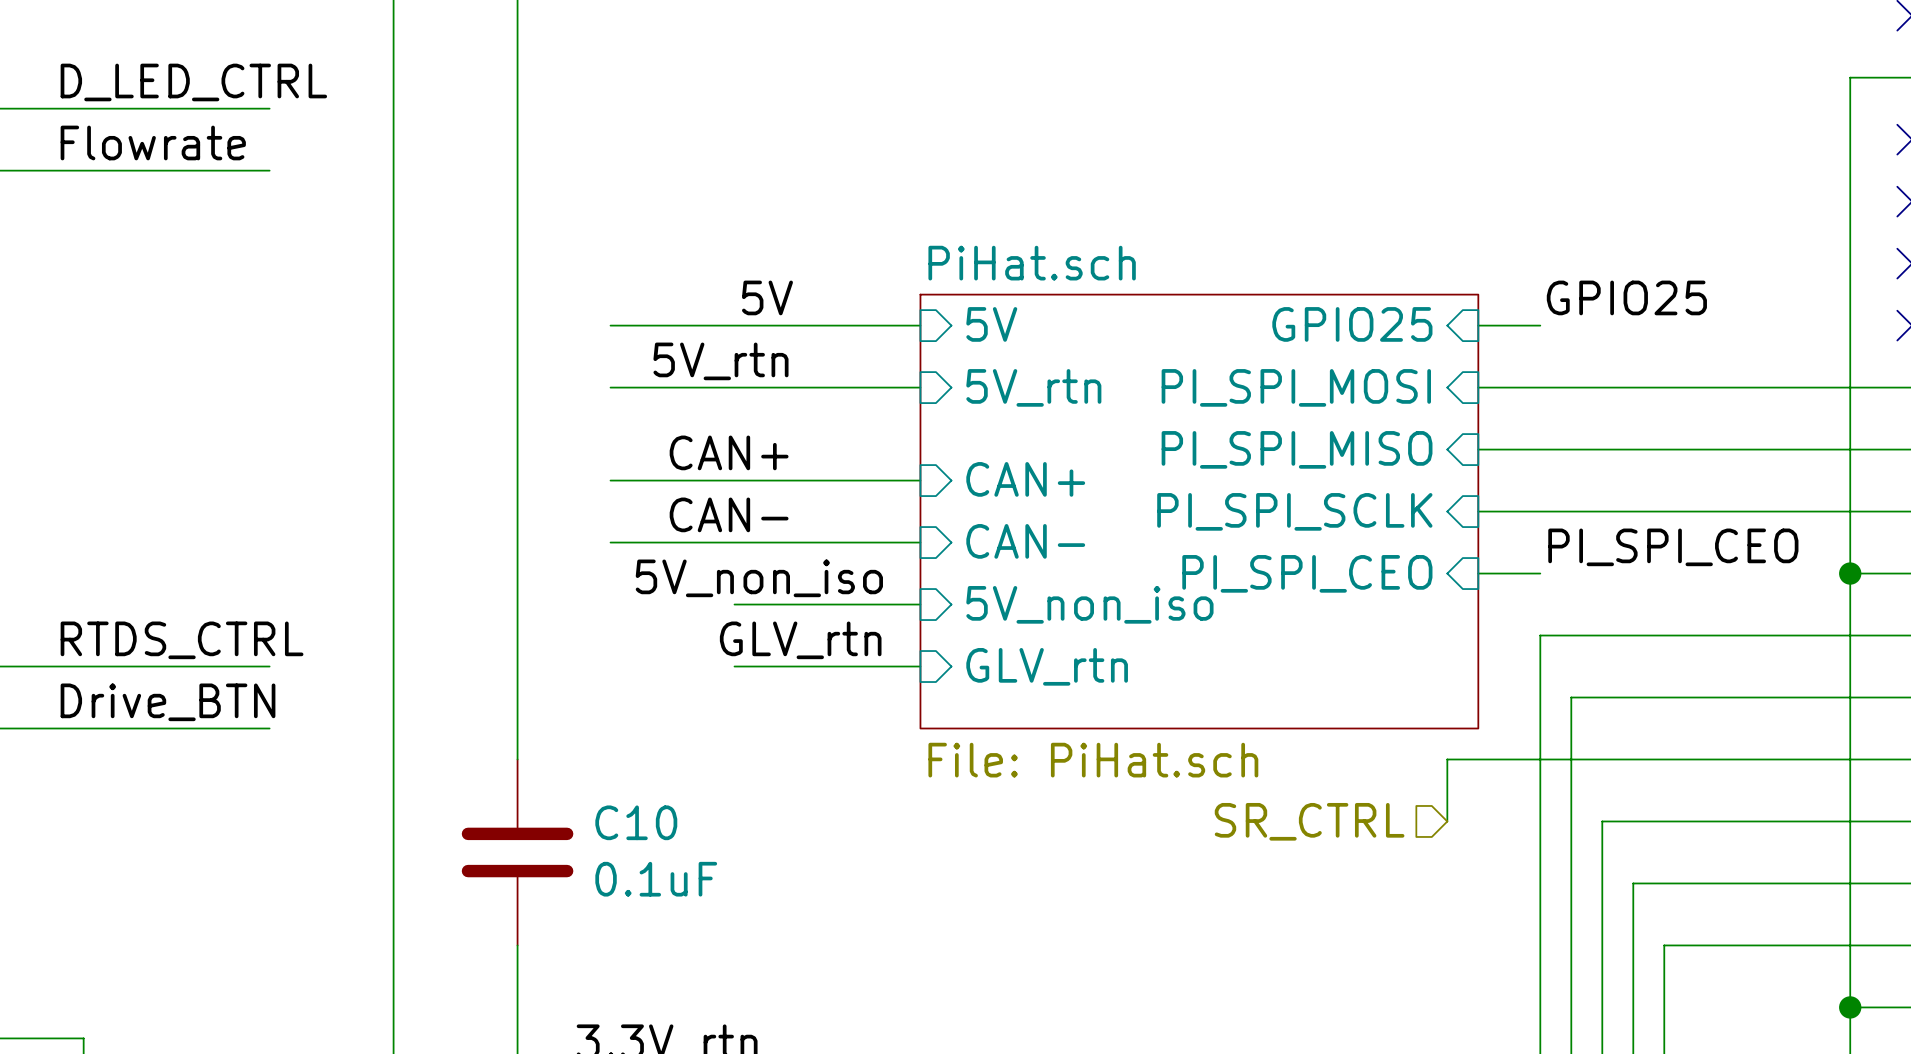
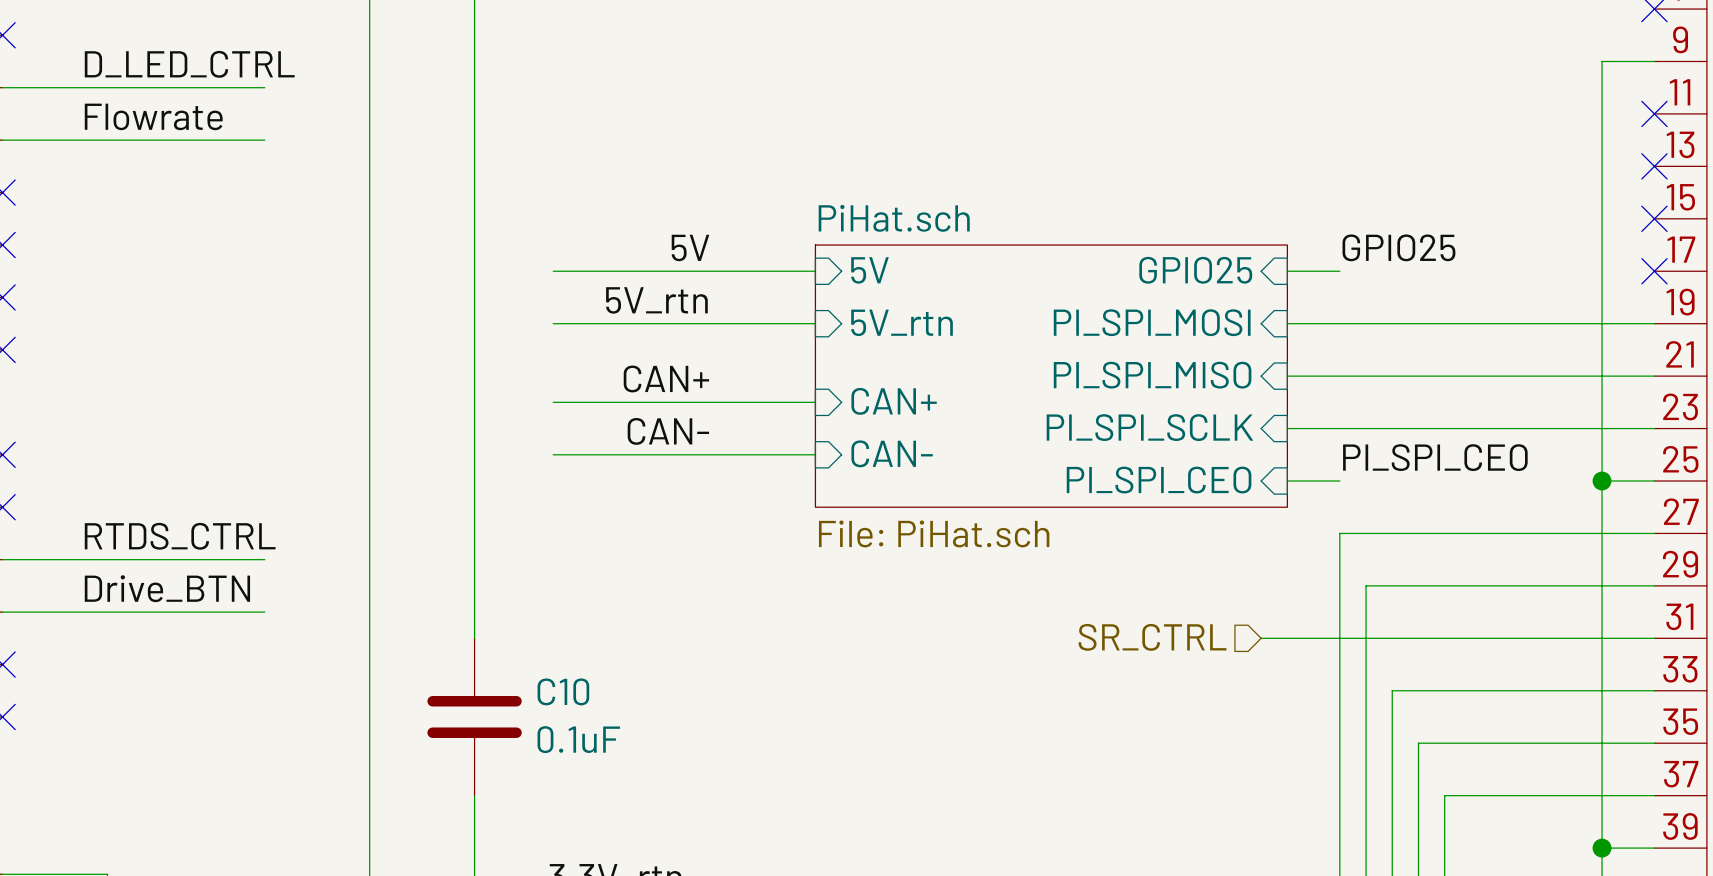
sheet PiHat.sch: none -> File: PiHat.sch (1051, 376)
sheet PiHat.sch: File: PiHat.sch (1199, 511) -> none
label: 5V_non_iso (759, 578) -> none
wire: (734, 604) (920, 604) -> none
sheet pin: 5V_non_iso (1089, 604) -> none
label: GLV_rtn (800, 640) -> none
wire: (734, 666) (920, 666) -> none
sheet pin: GLV_rtn (1047, 666) -> none
wire: (1447, 759) (1447, 821) -> none
hierarchical label position: SR_CTRL (1309, 821) -> SR_CTRL (1152, 637)

